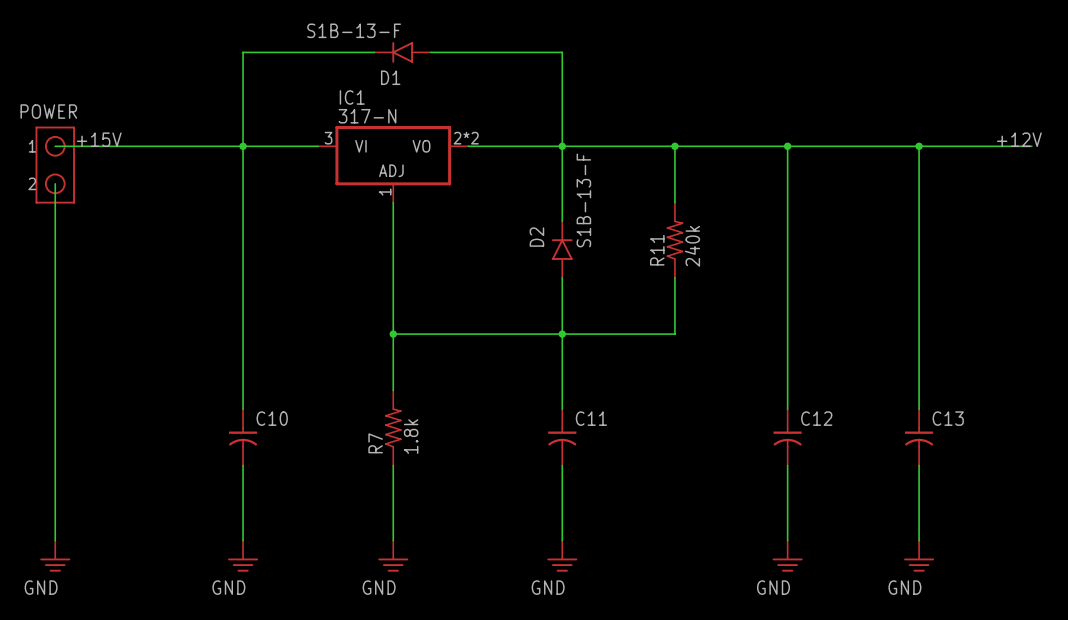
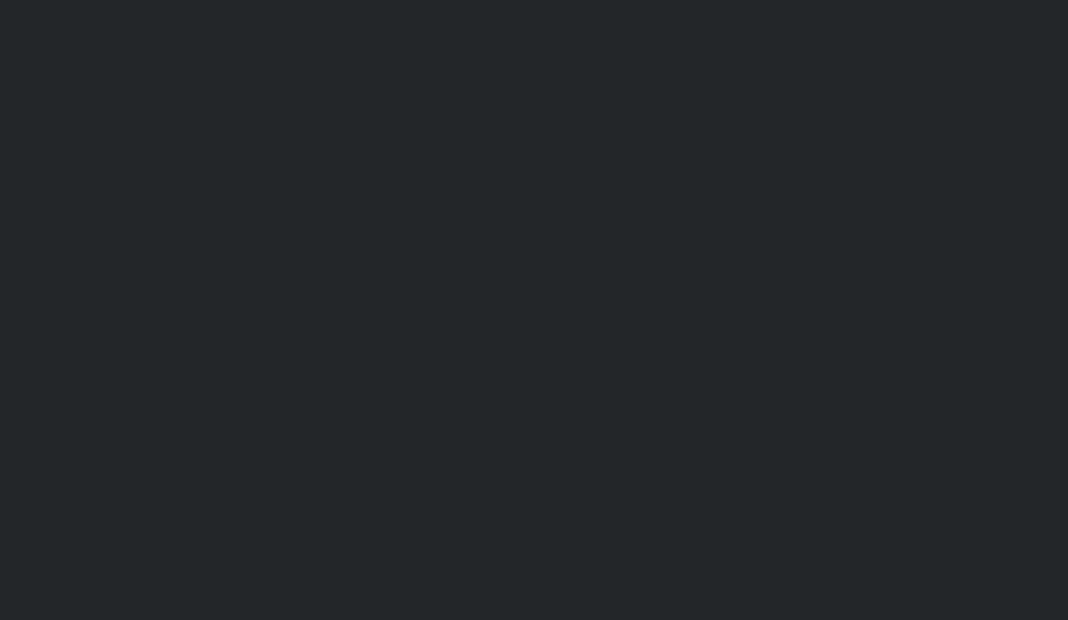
wire: (374, 52) (243, 52) (243, 409) -> none
D1: S1B-13-F (402, 52) -> none
wire: (430, 52) (562, 52) (562, 221) -> none
label: +15V (99, 139) -> none
label: +12V (1019, 139) -> none
wire: (55, 146) (318, 146) -> none
junction: (243, 146) -> none
wire: (468, 146) (1031, 146) -> none
junction: (562, 146) -> none
wire: (674, 146) (674, 202) -> none
junction: (674, 146) -> none
wire: (787, 146) (787, 409) -> none
junction: (787, 146) -> none
wire: (919, 146) (919, 409) -> none
junction: (919, 146) -> none
IC1: 317-N (393, 164) -> none
POWER: (55, 165) -> none
wire: (55, 183) (55, 540) -> none
wire: (393, 202) (393, 390) -> none
R11: 240k (674, 240) -> none
D2: S1B-13-F (562, 249) -> none
wire: (562, 277) (562, 409) -> none
wire: (674, 277) (674, 334) (393, 334) -> none
junction: (393, 334) -> none
junction: (562, 334) -> none
R7: 1.8k (393, 427) -> none
C10: (243, 437) -> none
C11: (562, 437) -> none
C12: (787, 437) -> none
C13: (919, 437) -> none
wire: (243, 465) (243, 540) -> none
wire: (393, 465) (393, 540) -> none
wire: (562, 465) (562, 540) -> none
wire: (787, 465) (787, 540) -> none
wire: (919, 465) (919, 540) -> none
power symbol: GND (55, 556) -> none
power symbol: GND (243, 556) -> none
power symbol: GND (393, 556) -> none
power symbol: GND (562, 556) -> none
power symbol: GND (787, 556) -> none
power symbol: GND (919, 556) -> none

